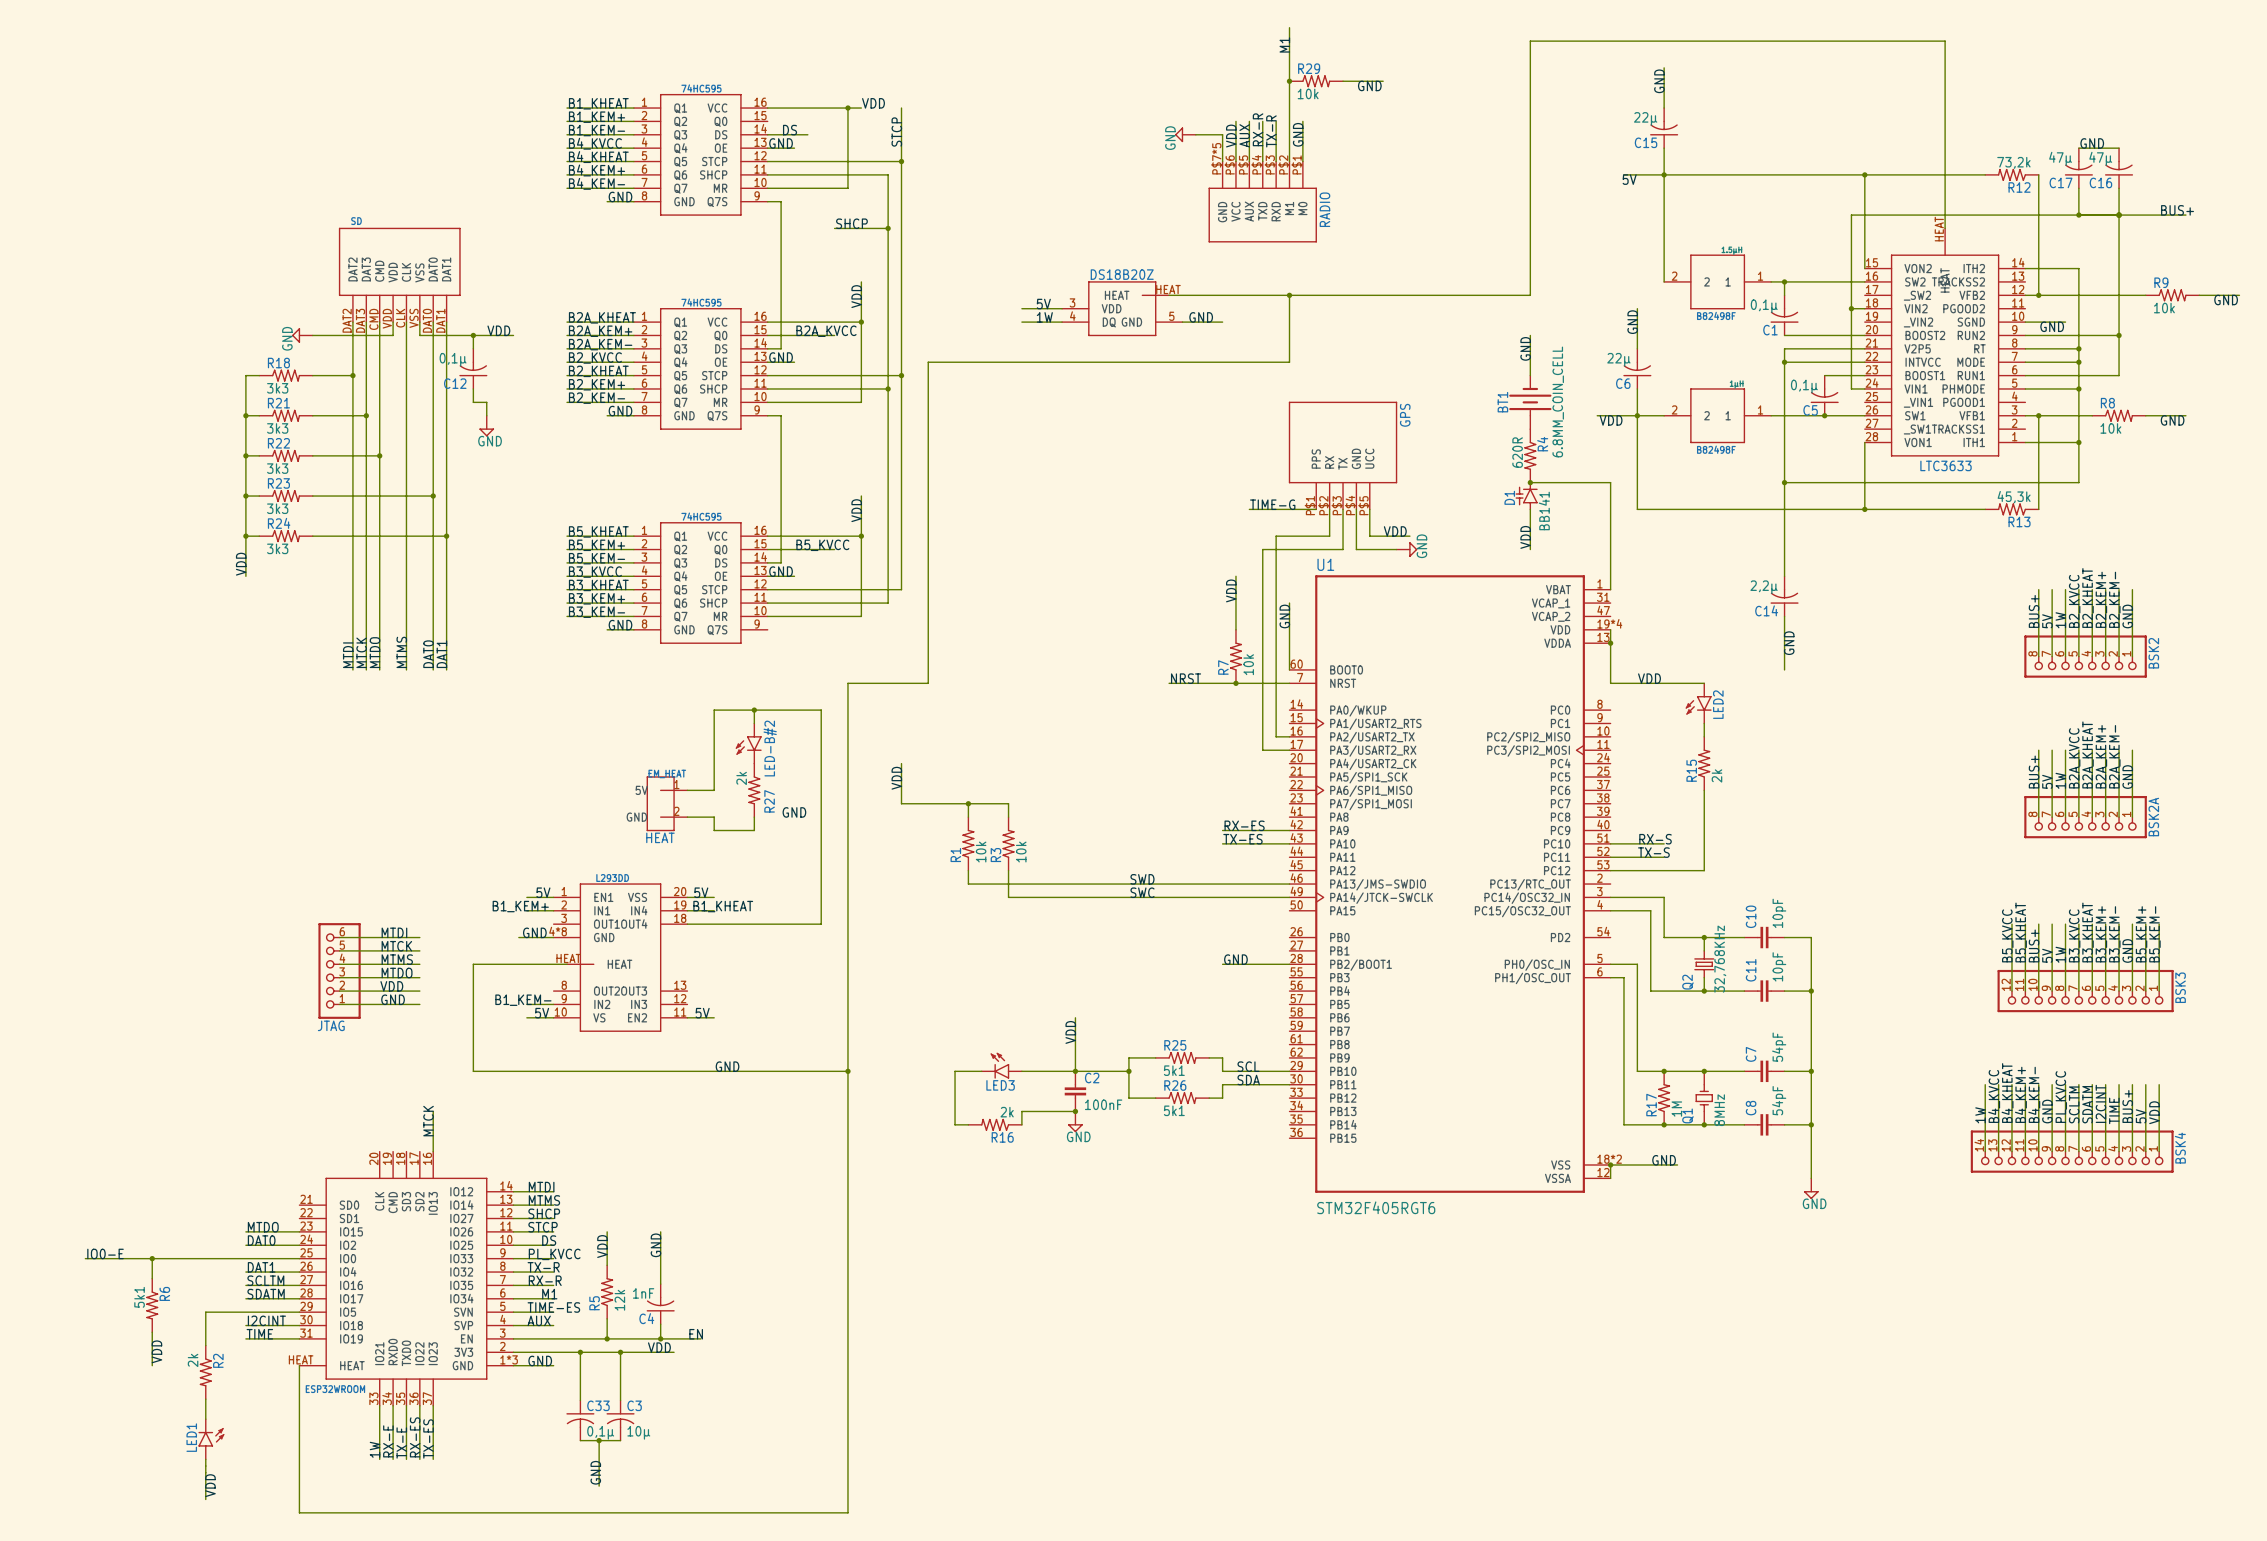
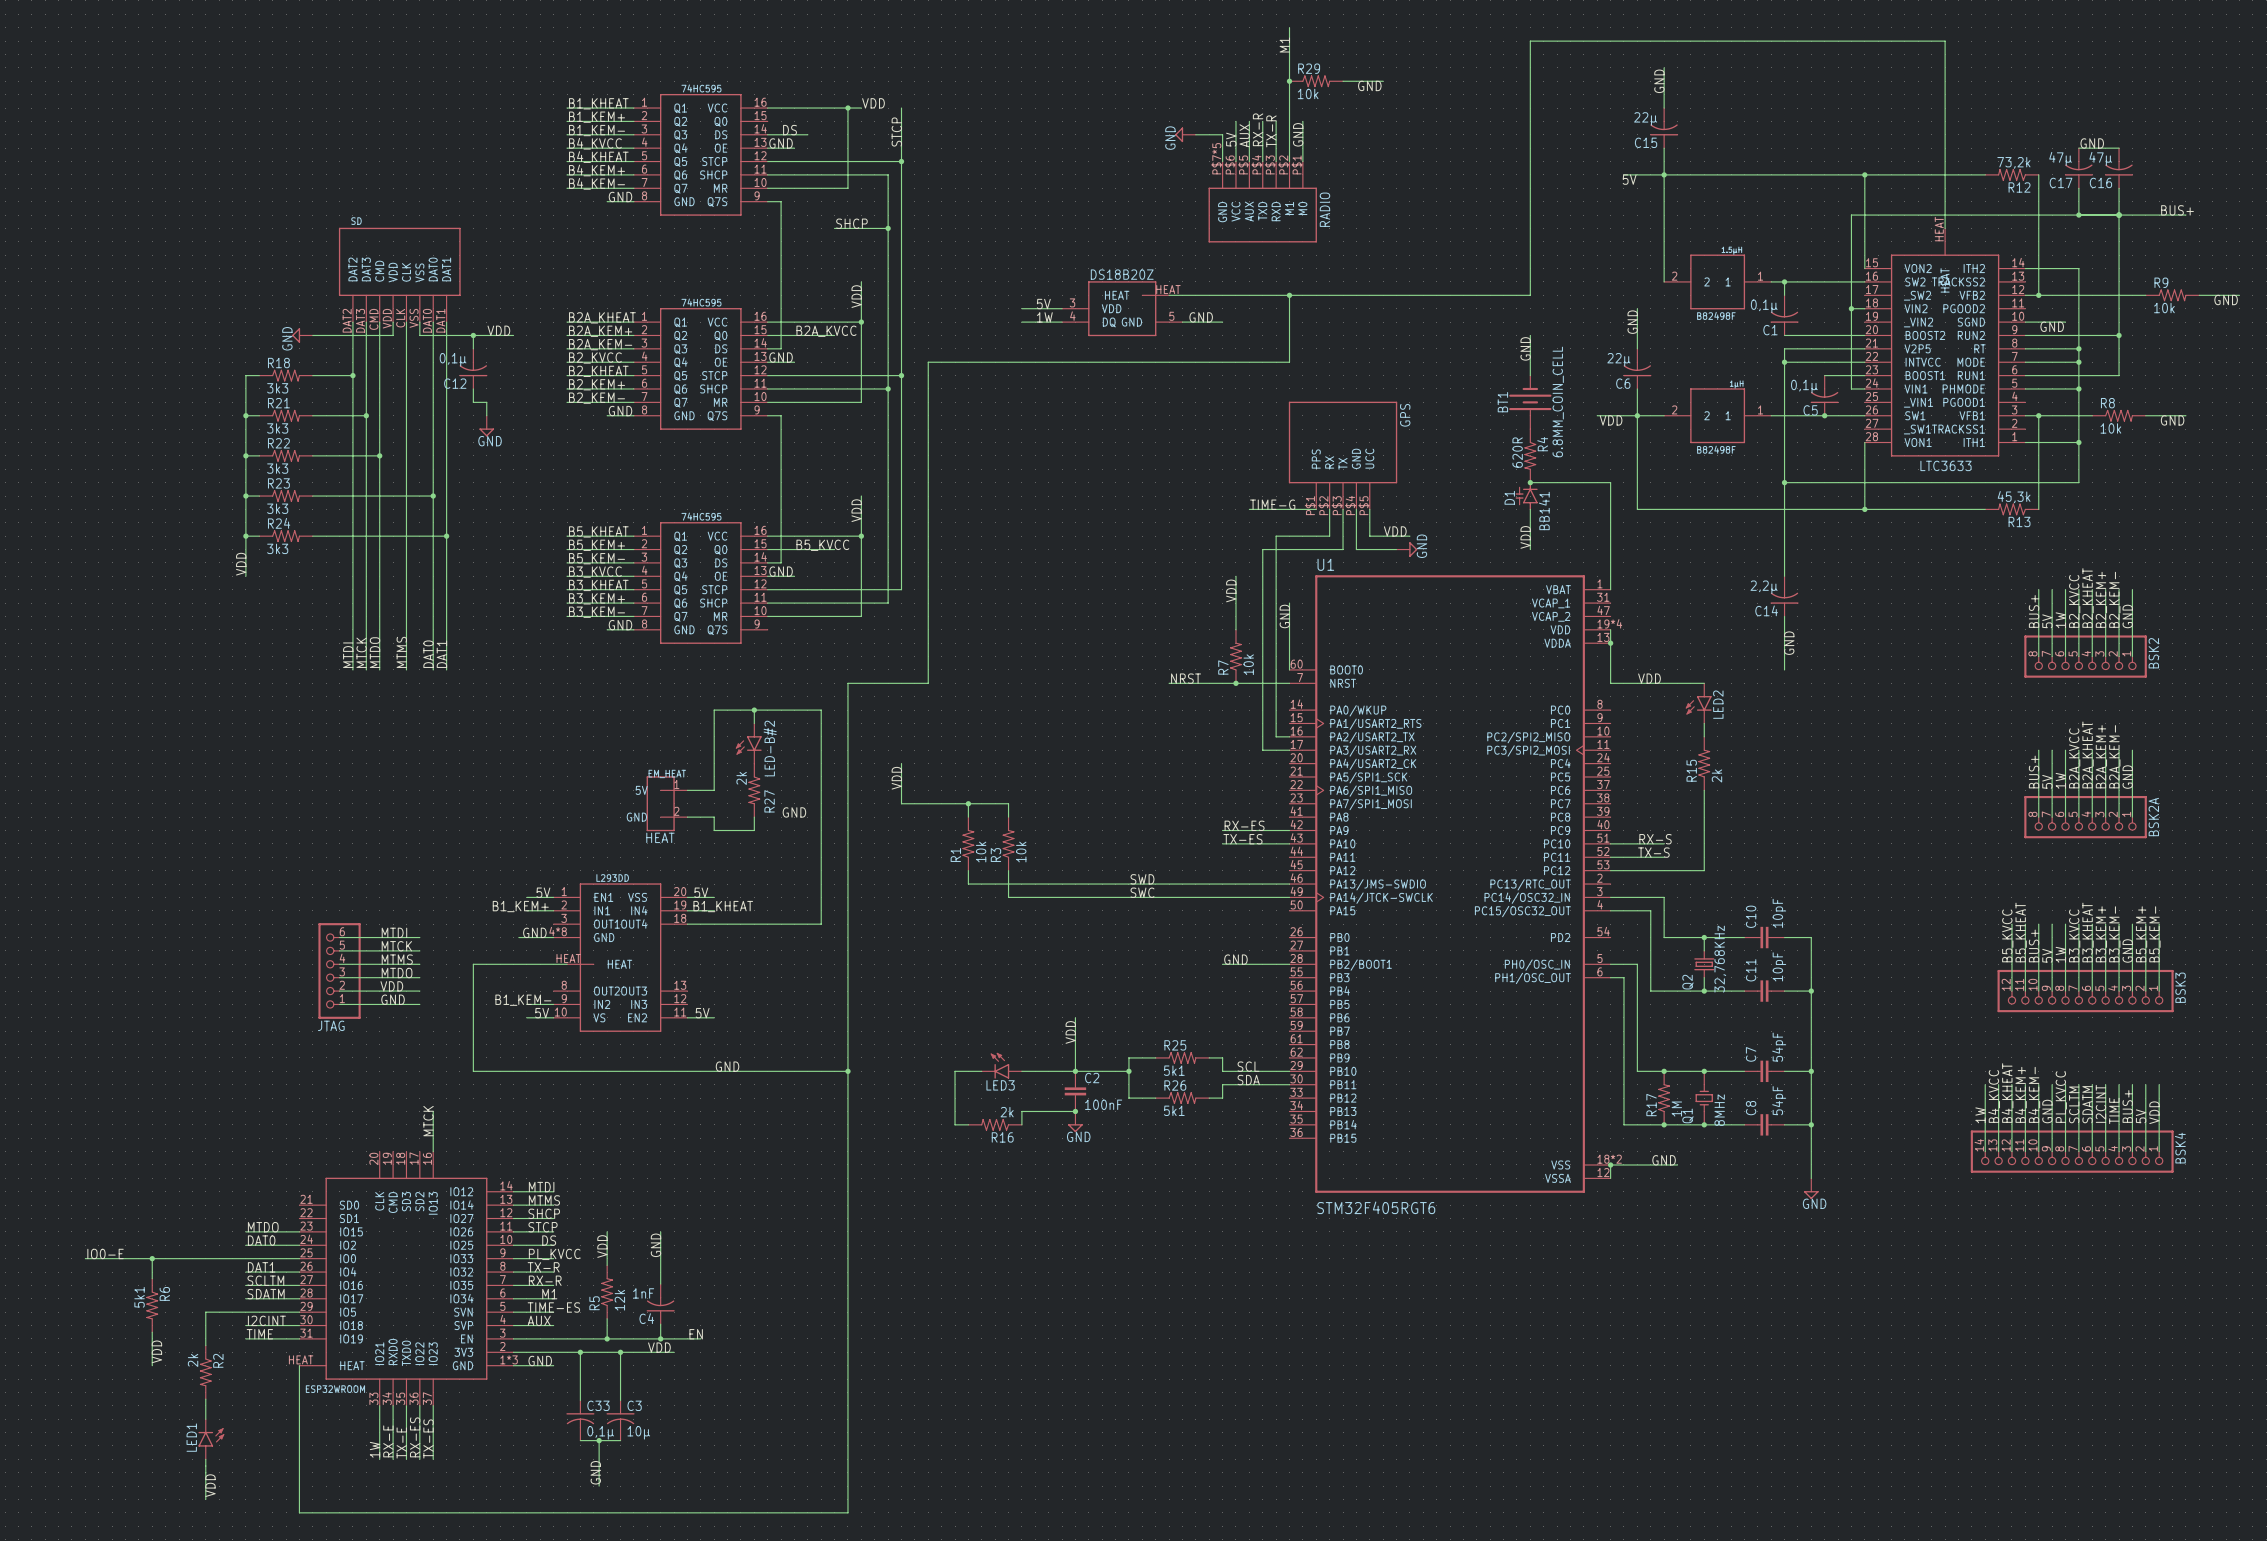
label: VDD (1231, 136) -> 5V (1231, 139)

